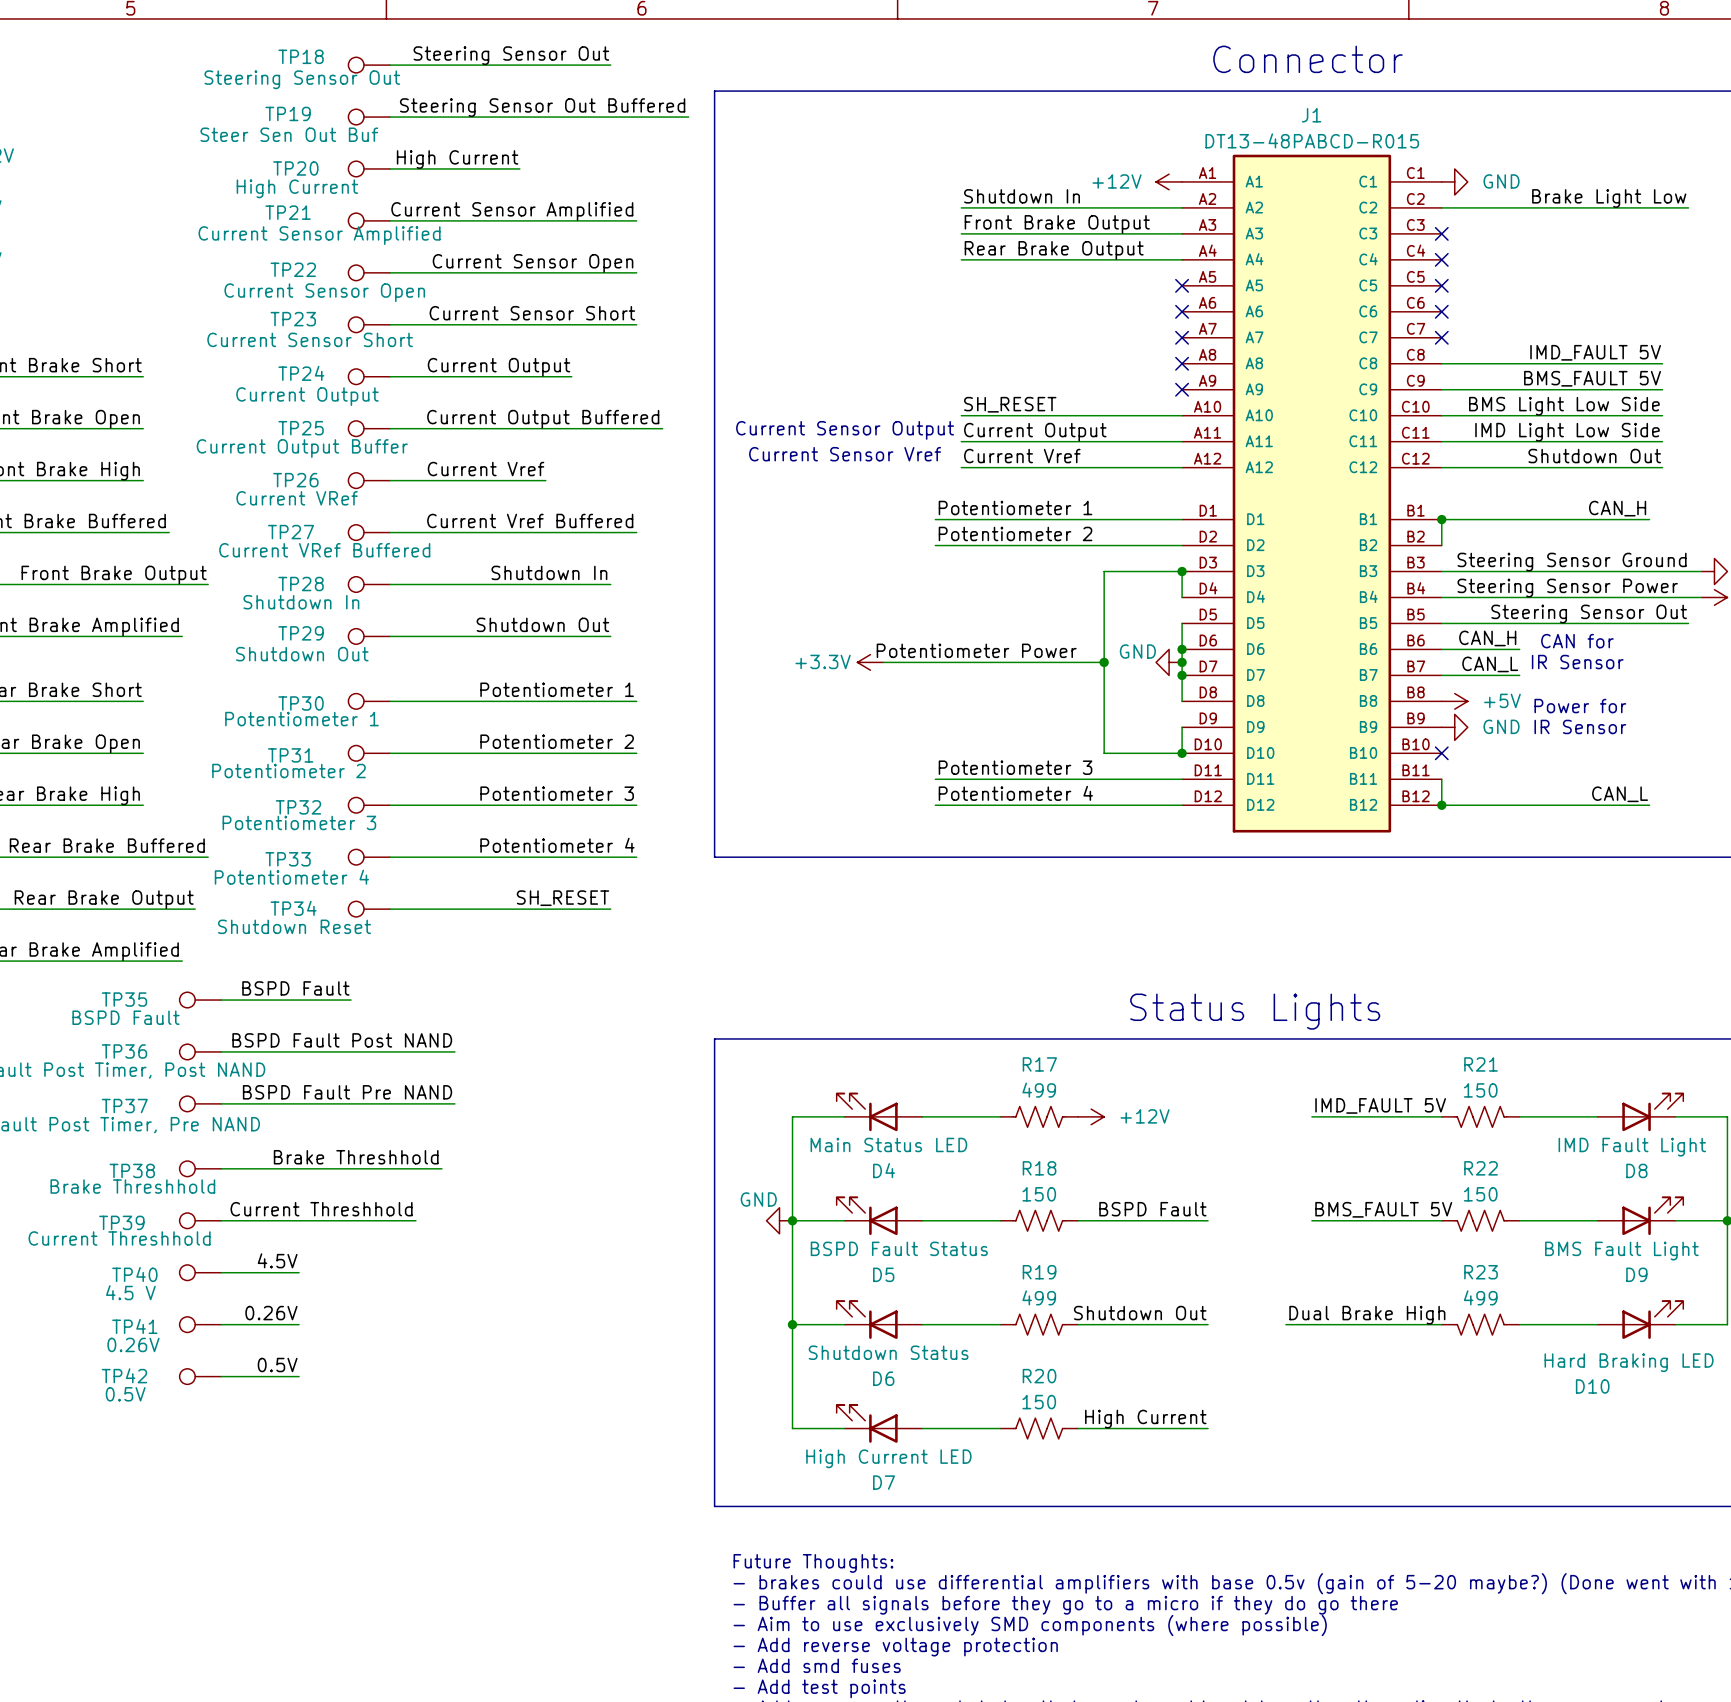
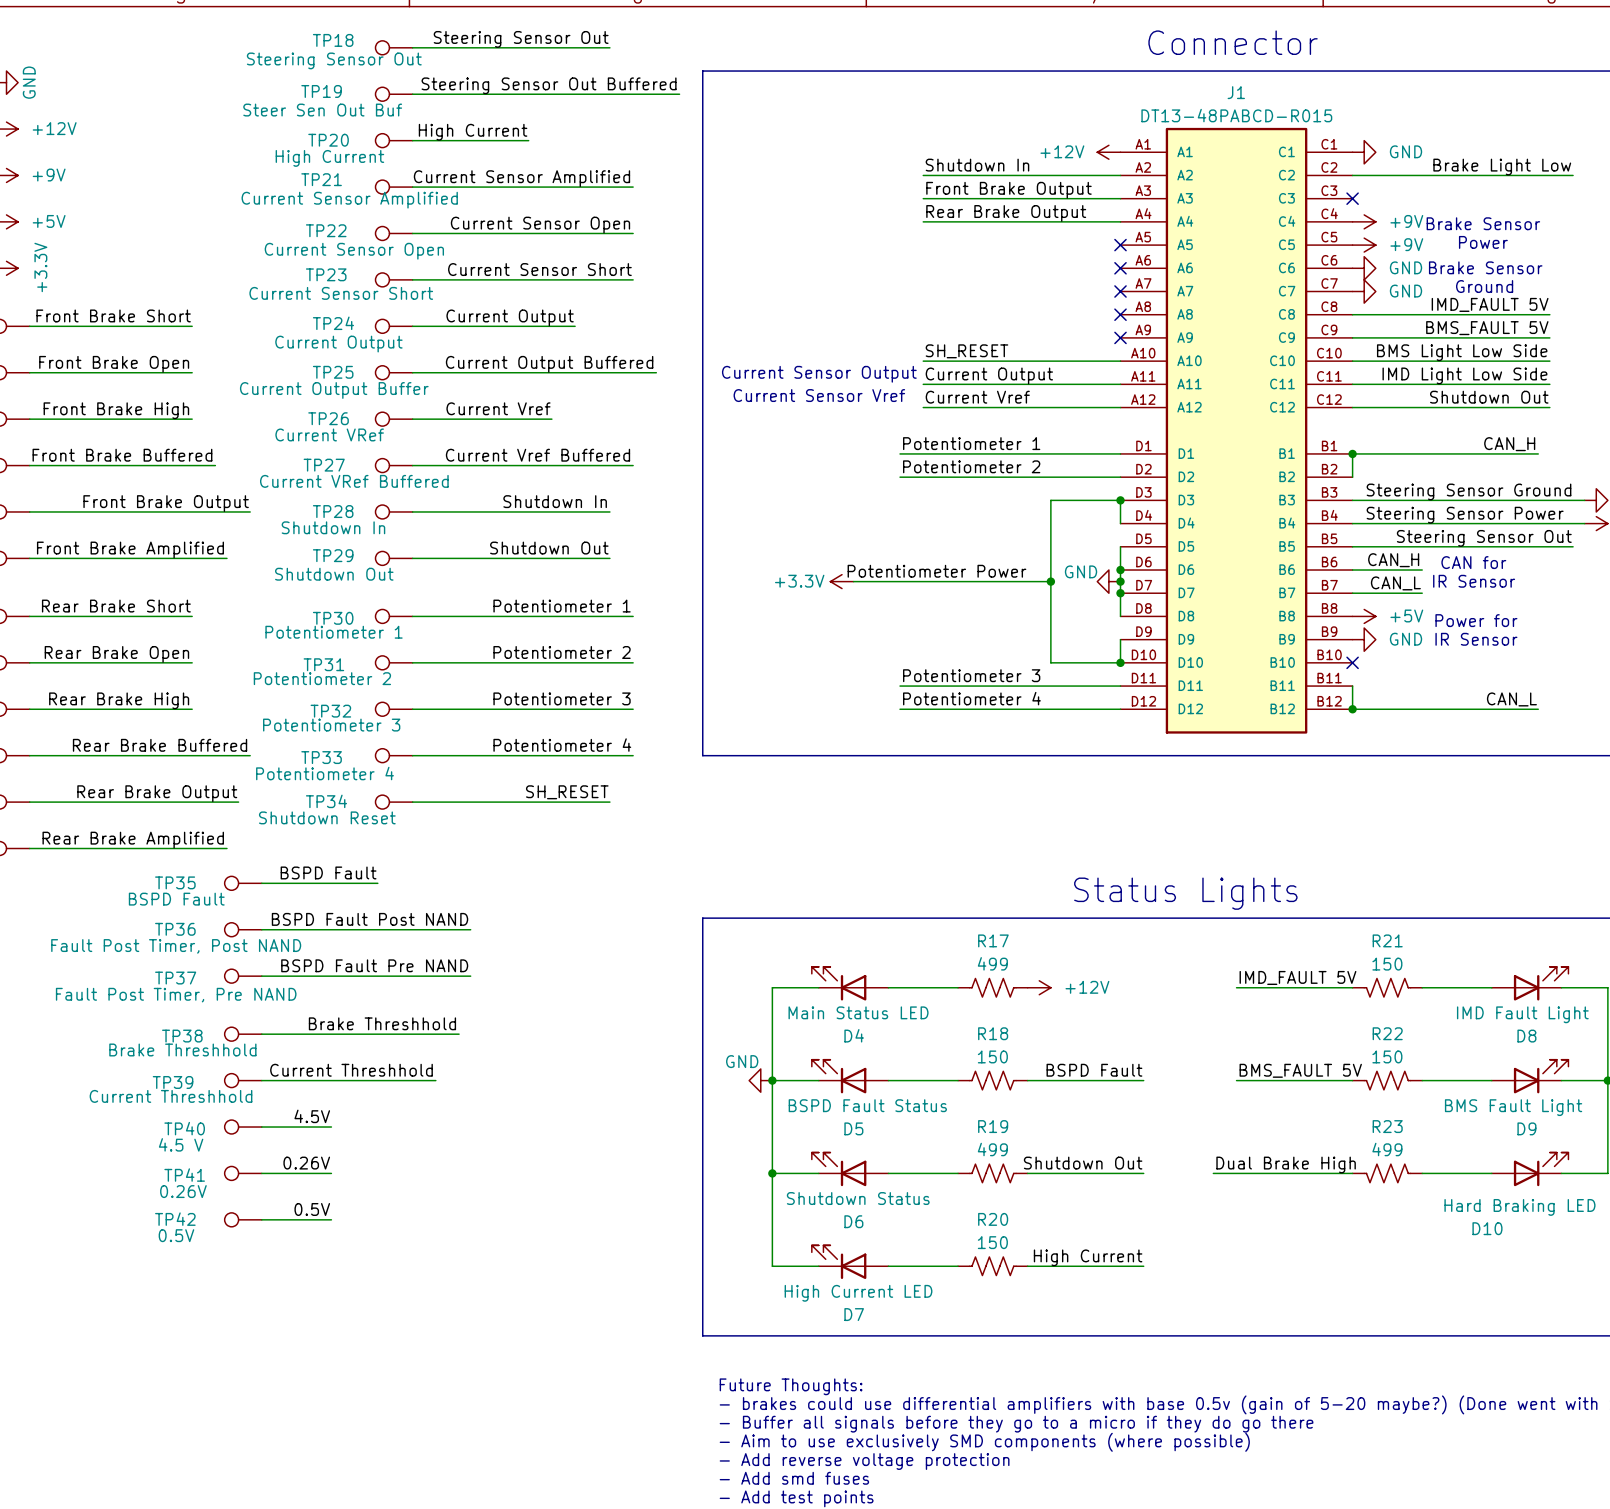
no-connect mark: (1441, 259) -> none
power symbol: none -> +9V (1364, 221)
text: none -> Brake Sensor (1483, 223)
text: none -> Power (1483, 242)
no-connect mark: (1441, 285) -> none
power symbol: none -> +9V (1364, 245)
no-connect mark: (1441, 311) -> none
power symbol: none -> GND (1364, 268)
text: none -> Brake Sensor (1485, 267)
text: none -> Ground (1484, 286)
no-connect mark: (1441, 337) -> none
power symbol: none -> GND (1364, 291)

